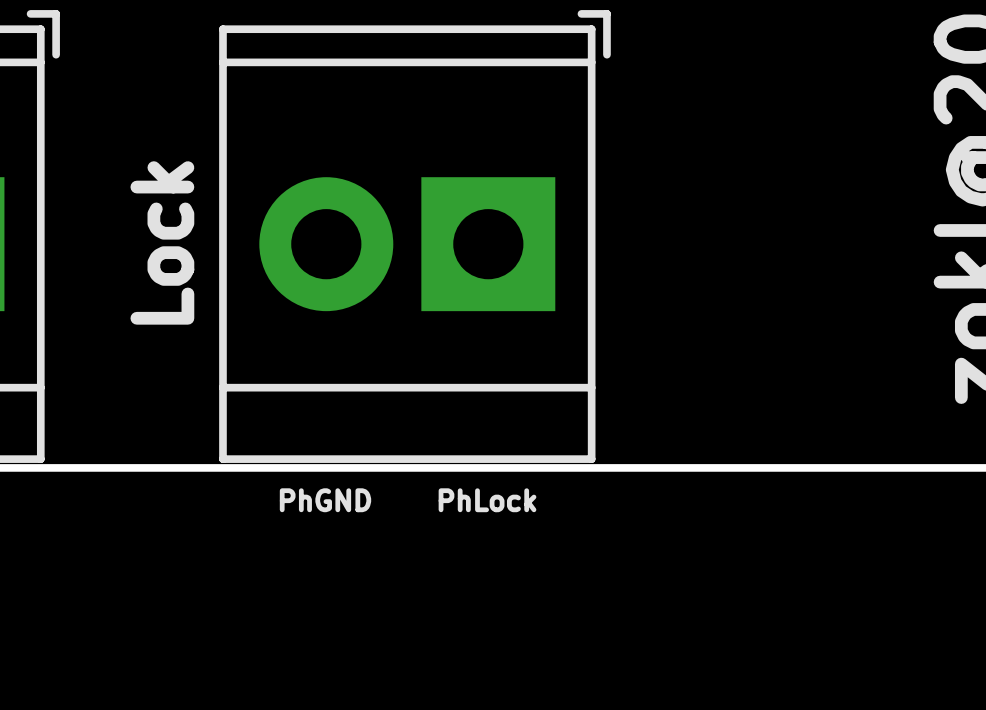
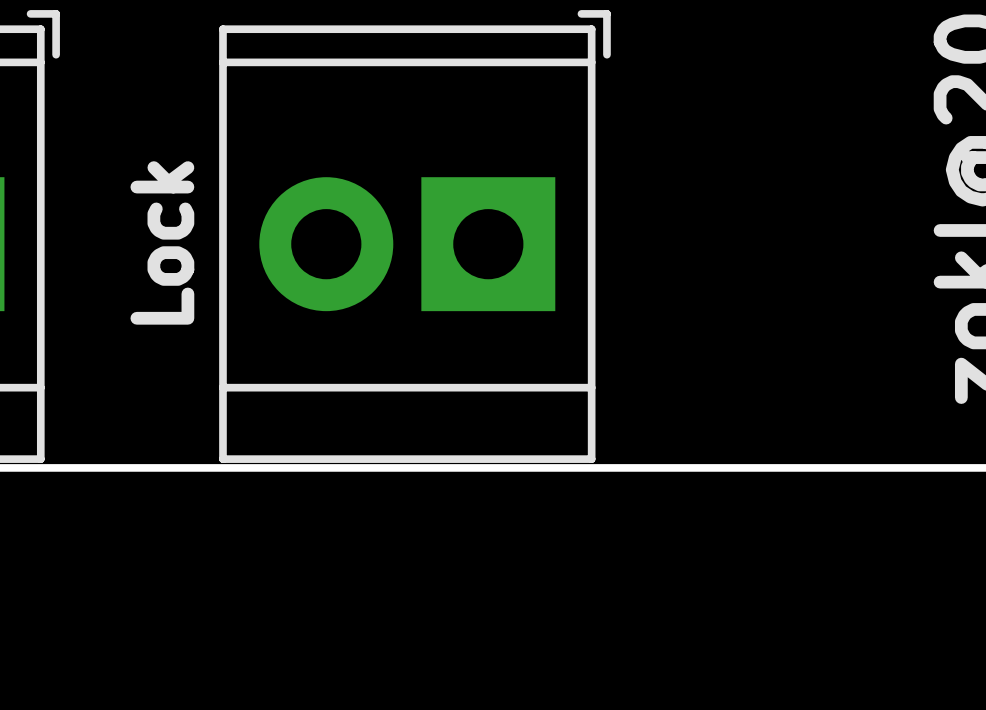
text: PhGND (325, 500) -> none
text: PhLock (487, 500) -> none

